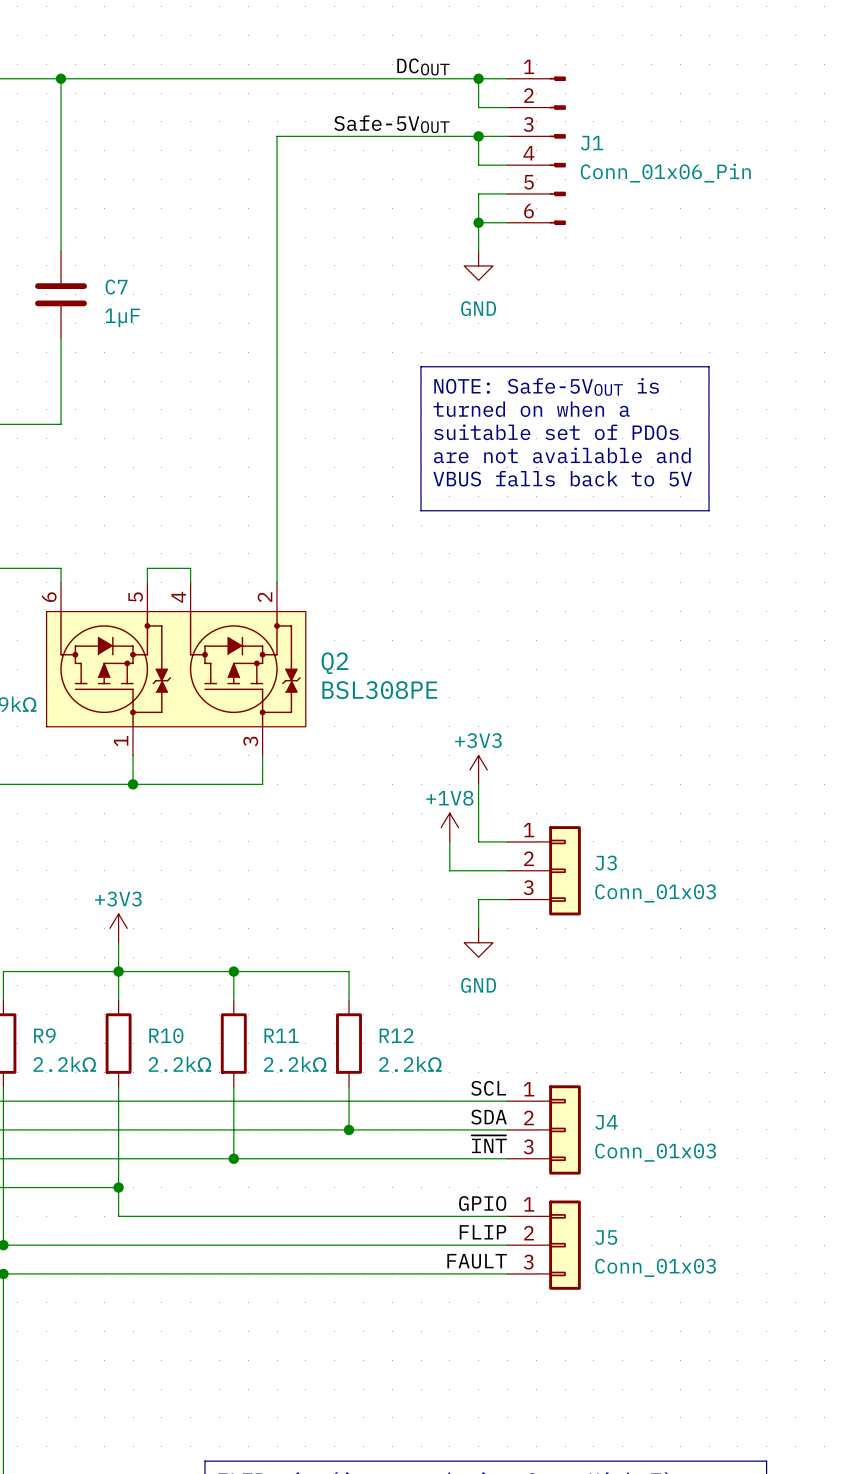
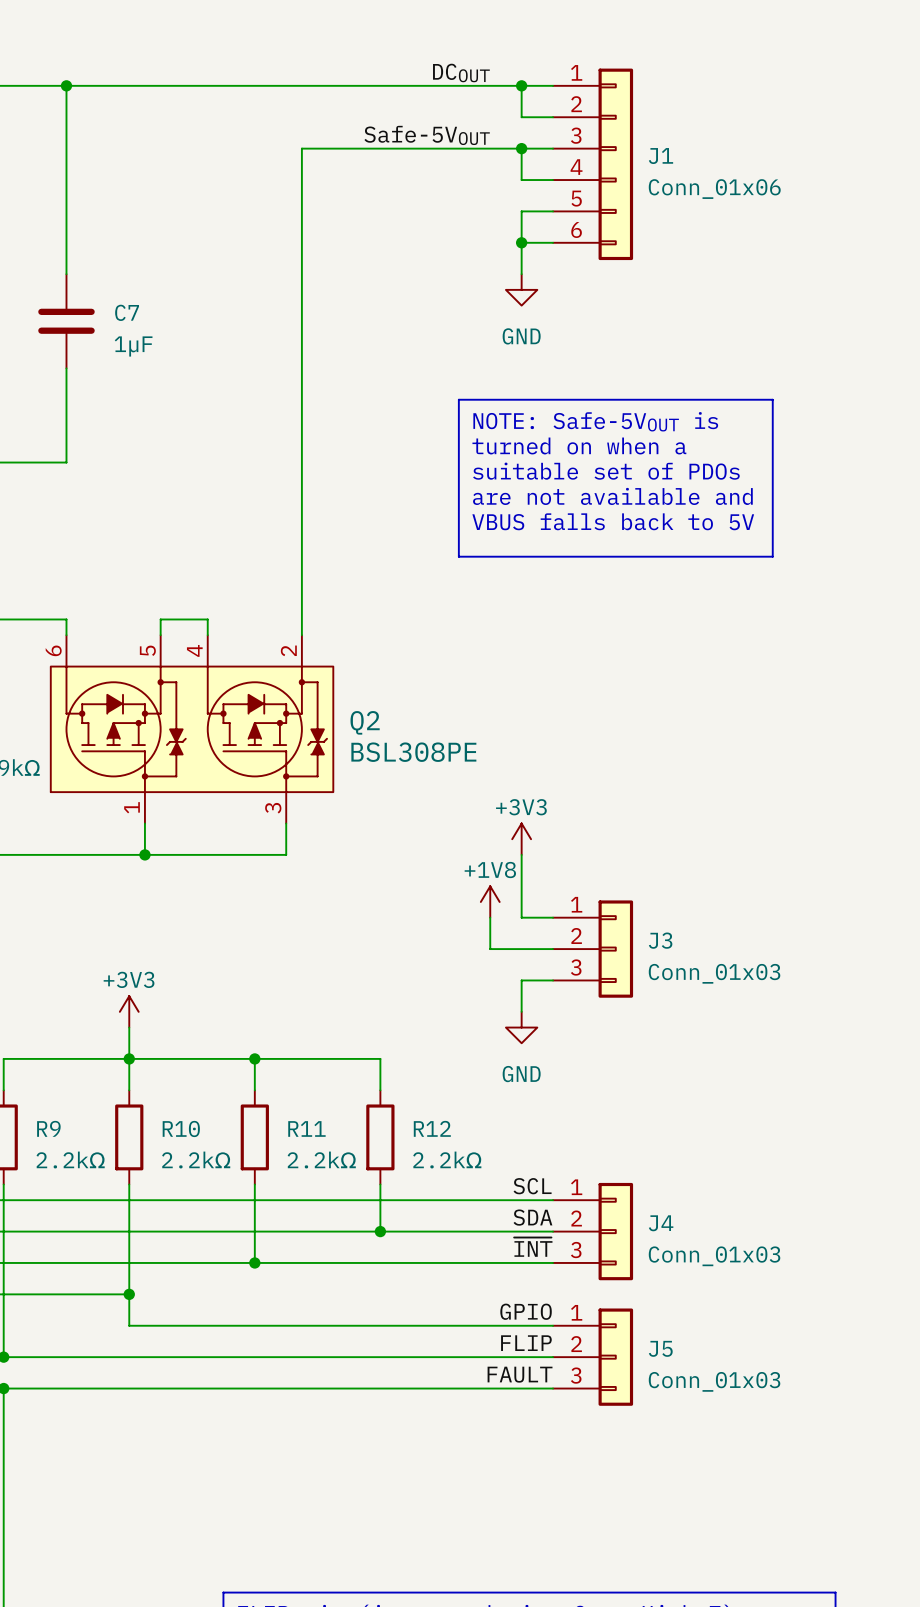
J1 symbol: [507, 76, 566, 226] -> [553, 68, 634, 261]
J1 value: Conn_01x06_Pin (665, 173) -> Conn_01x06 (714, 189)

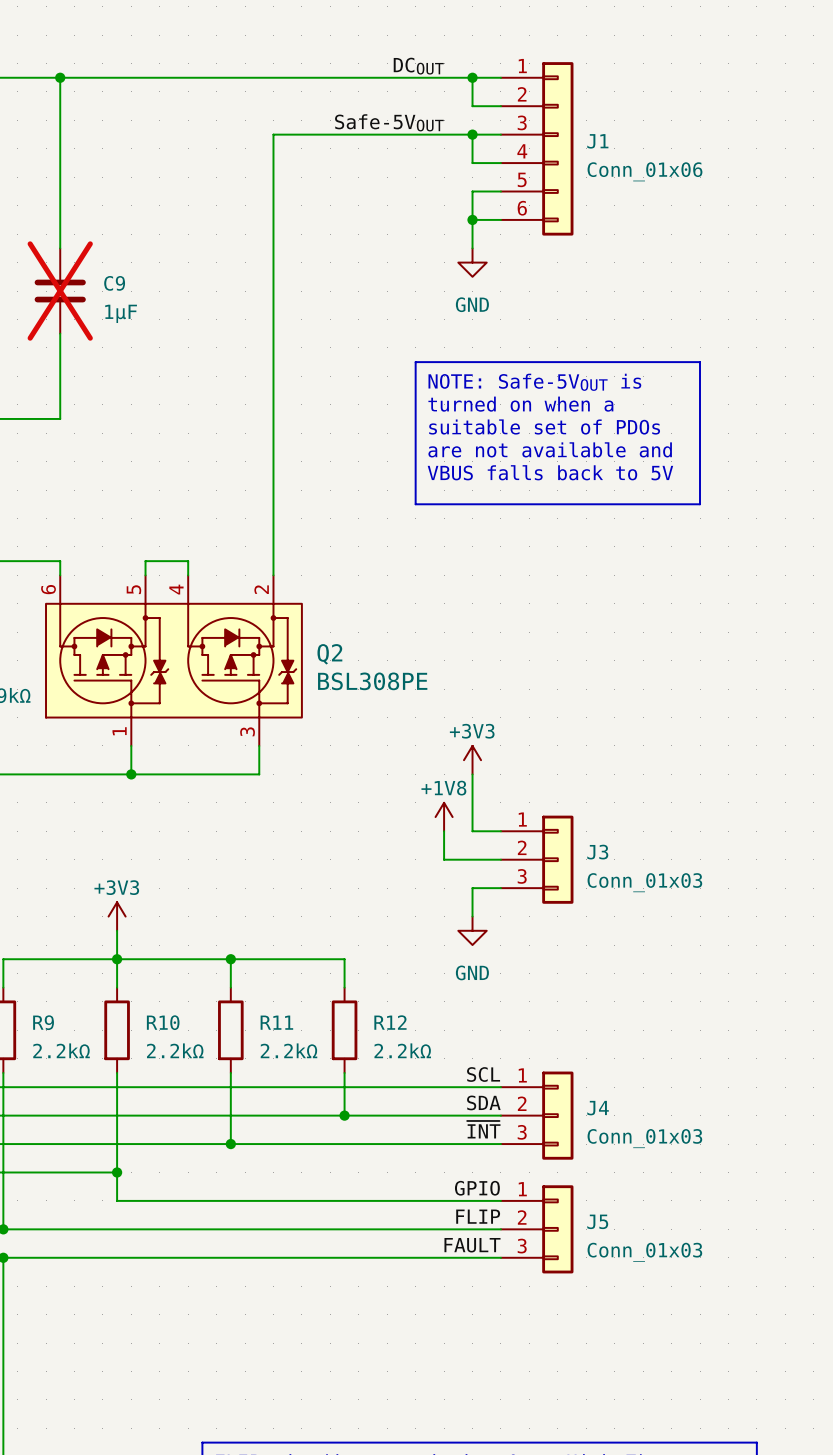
C7 name: C7 (127, 312) -> C9 (114, 283)
C7 do-not-place cross: none -> (60, 291)

